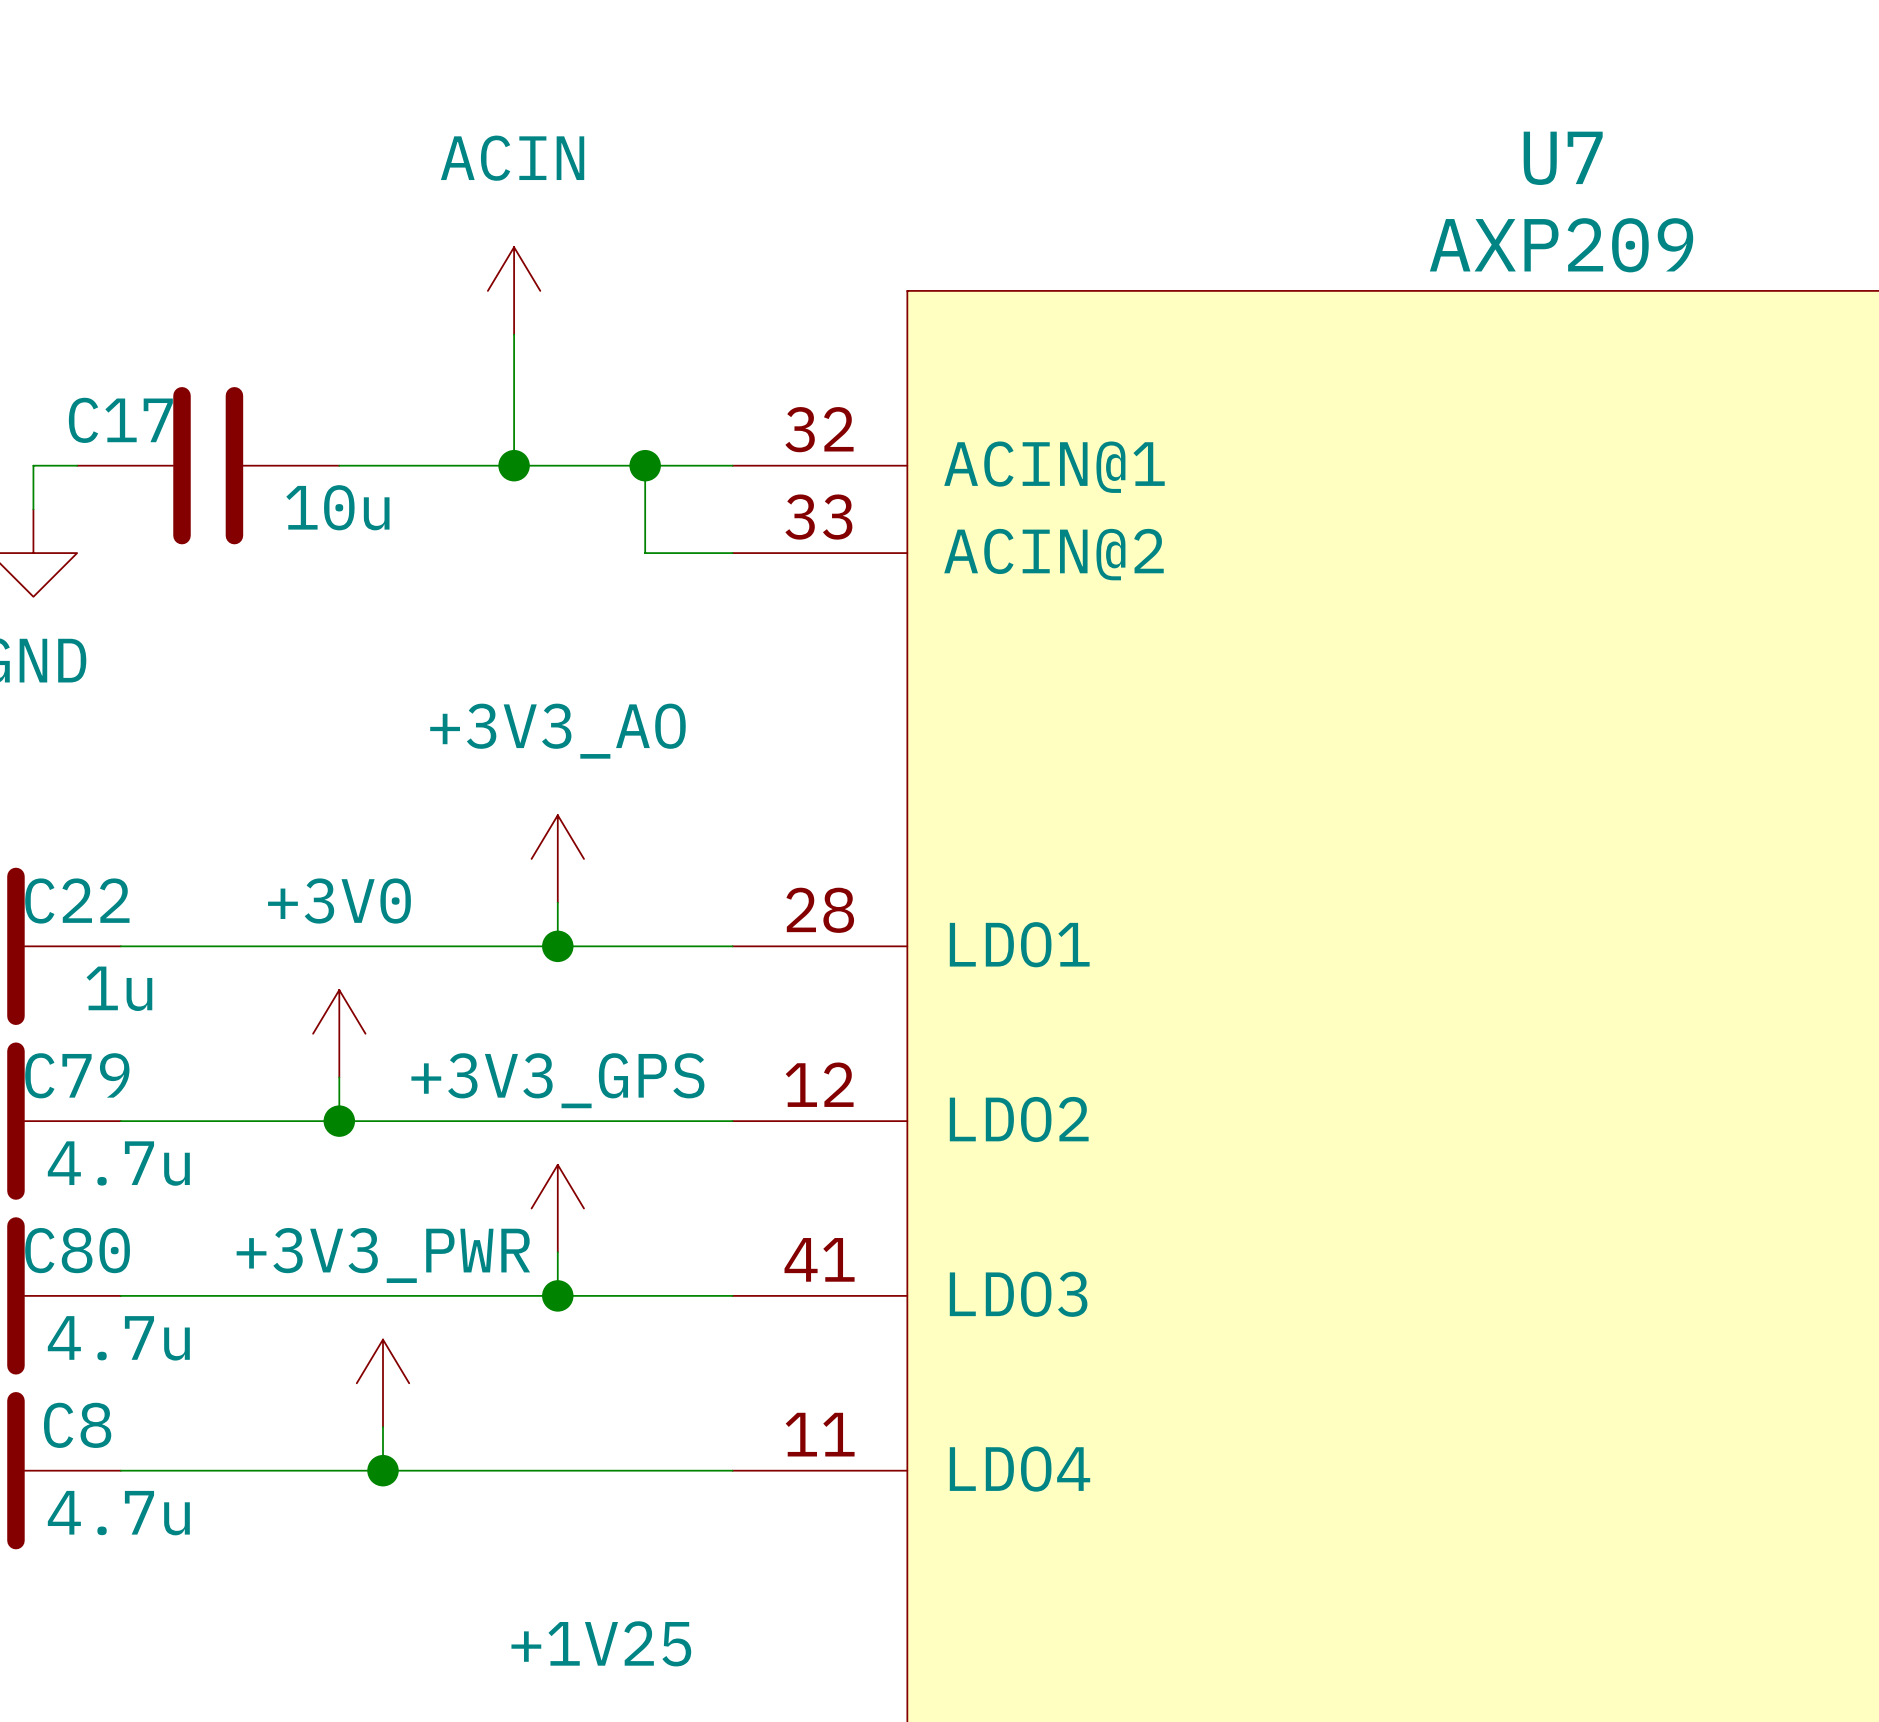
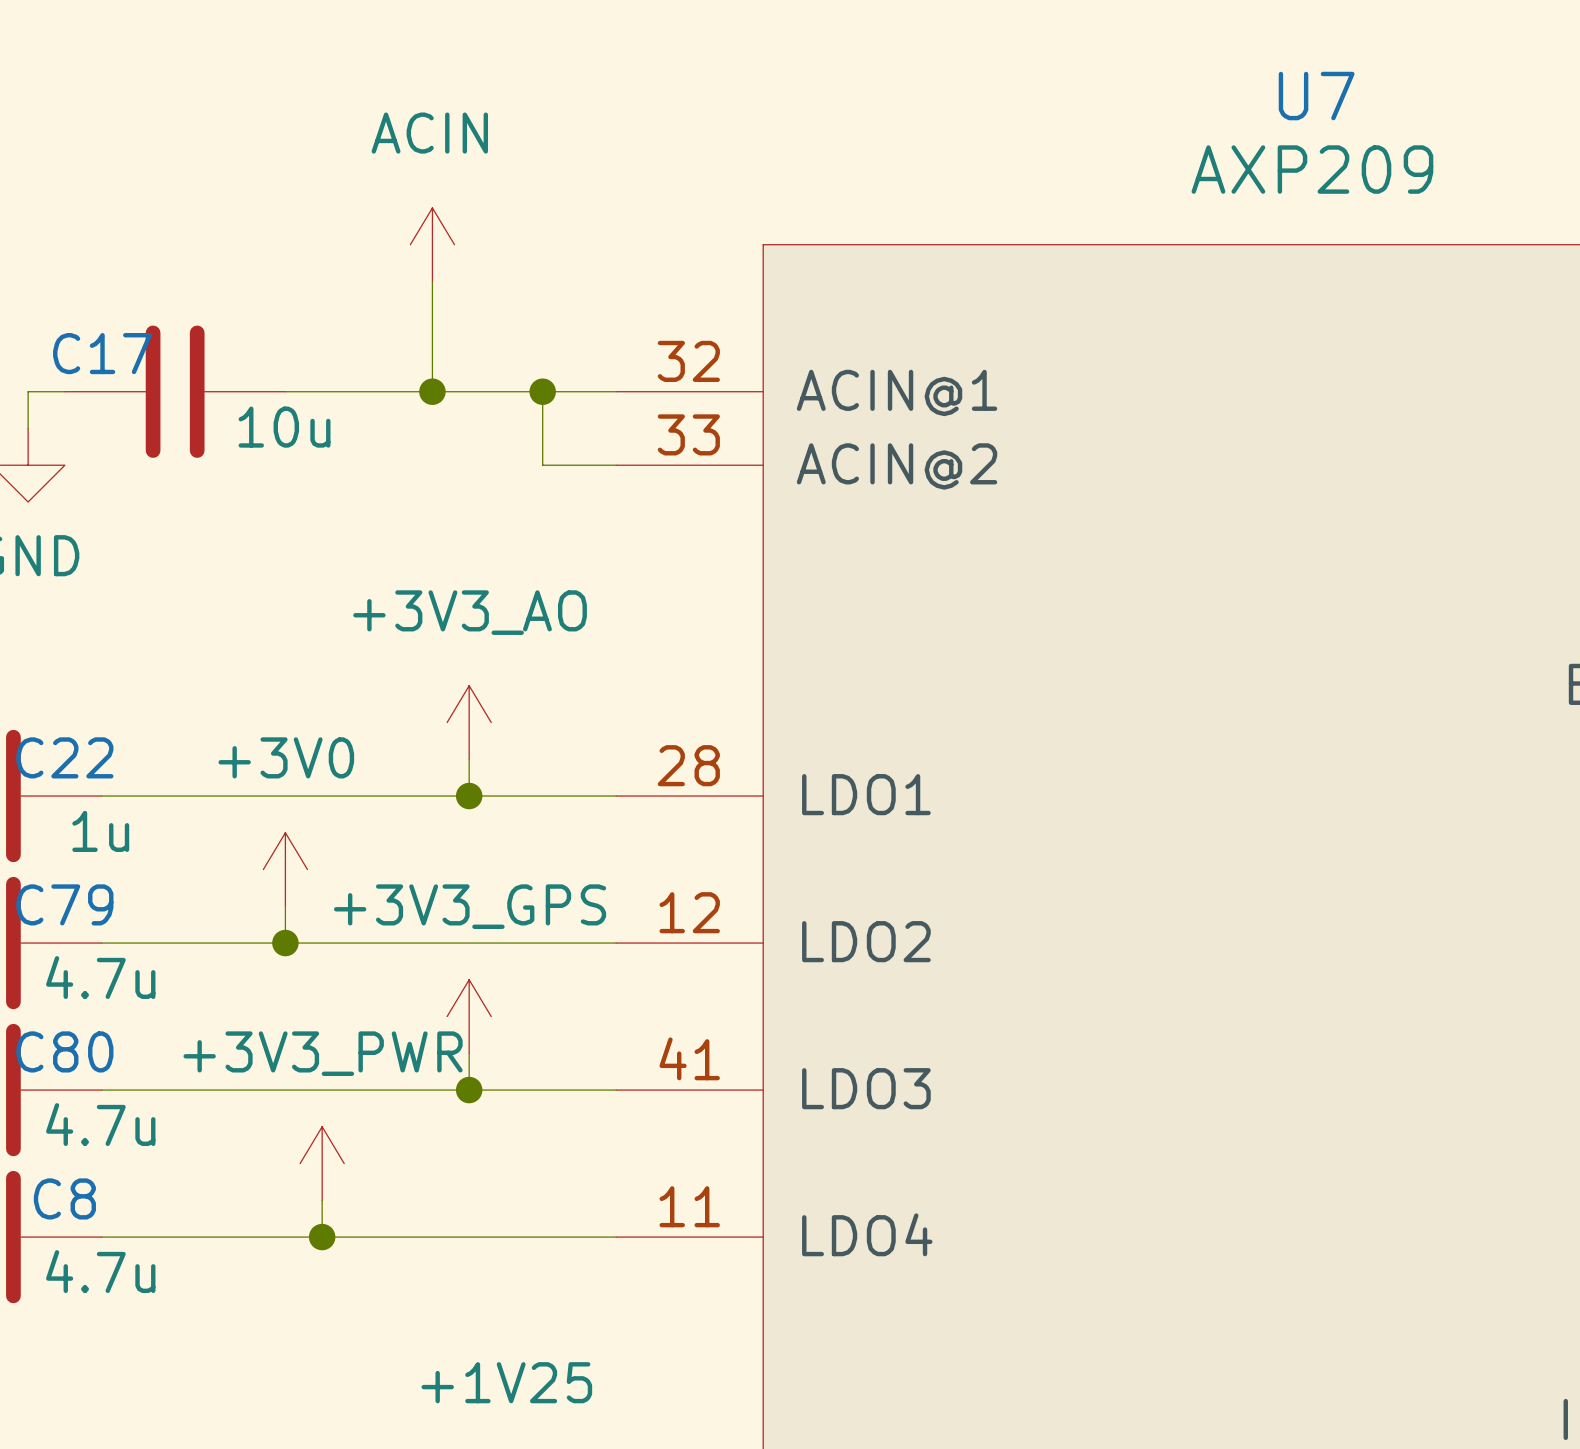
U7 name position: U7 (1563, 158) -> U7 (1316, 96)
U7 value position: AXP209 (1561, 245) -> AXP209 (1312, 169)

